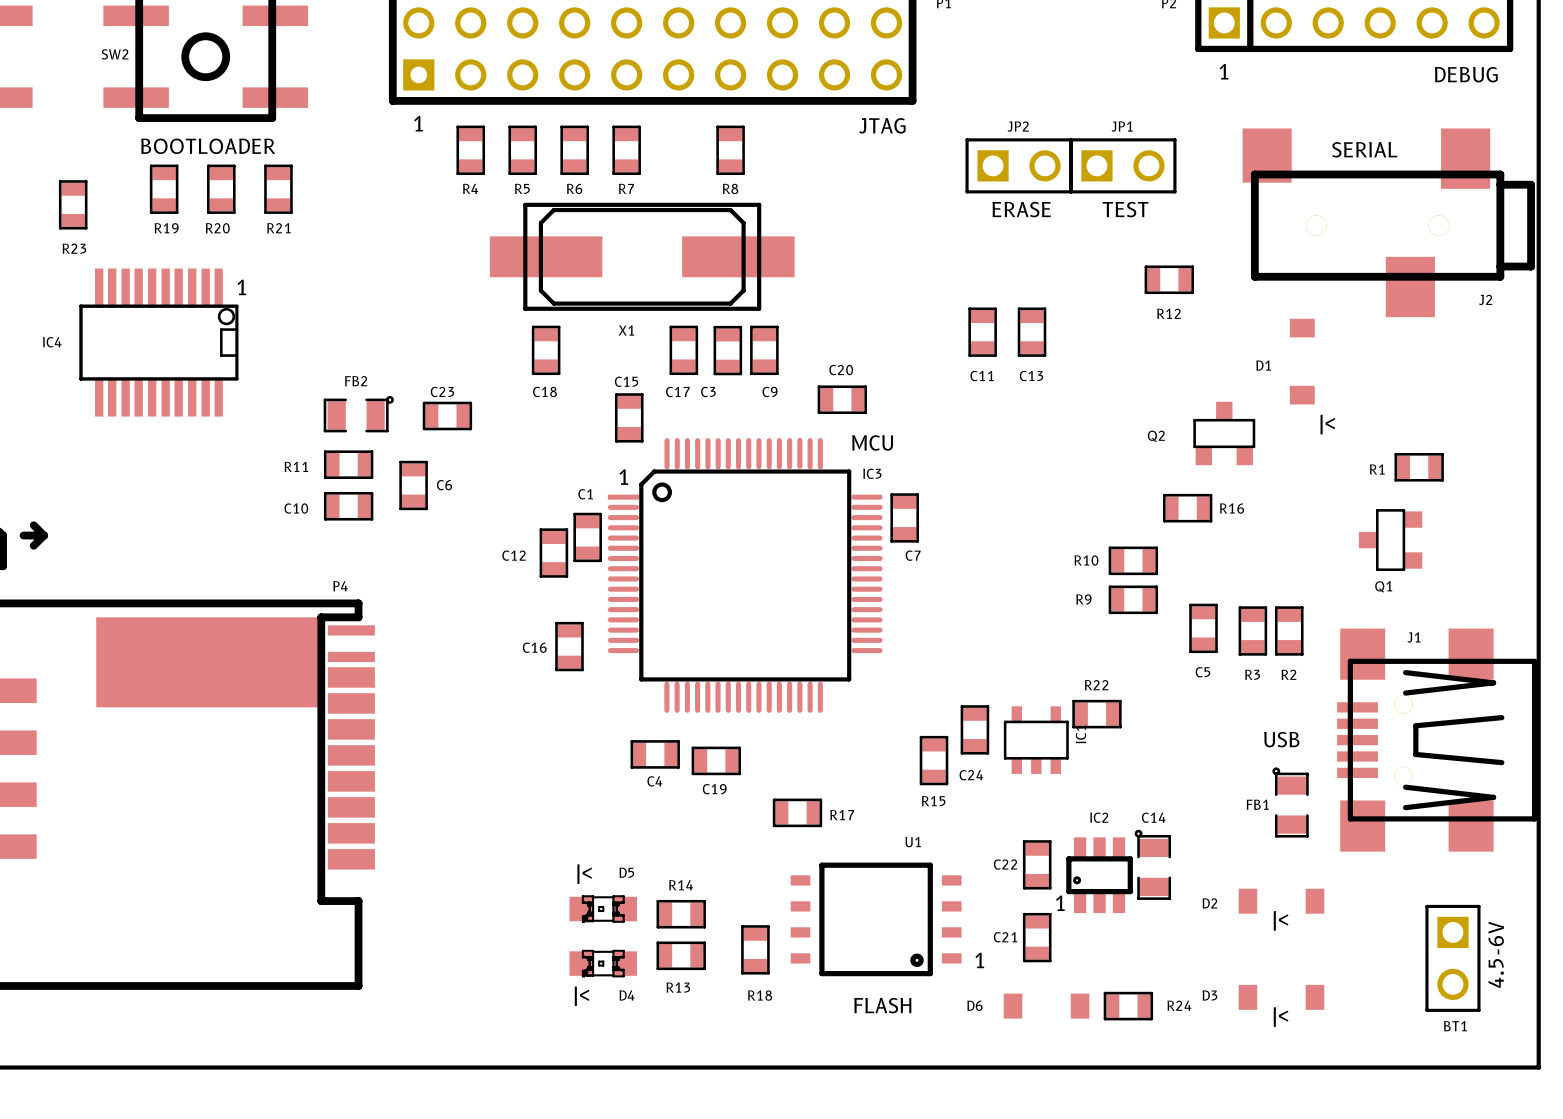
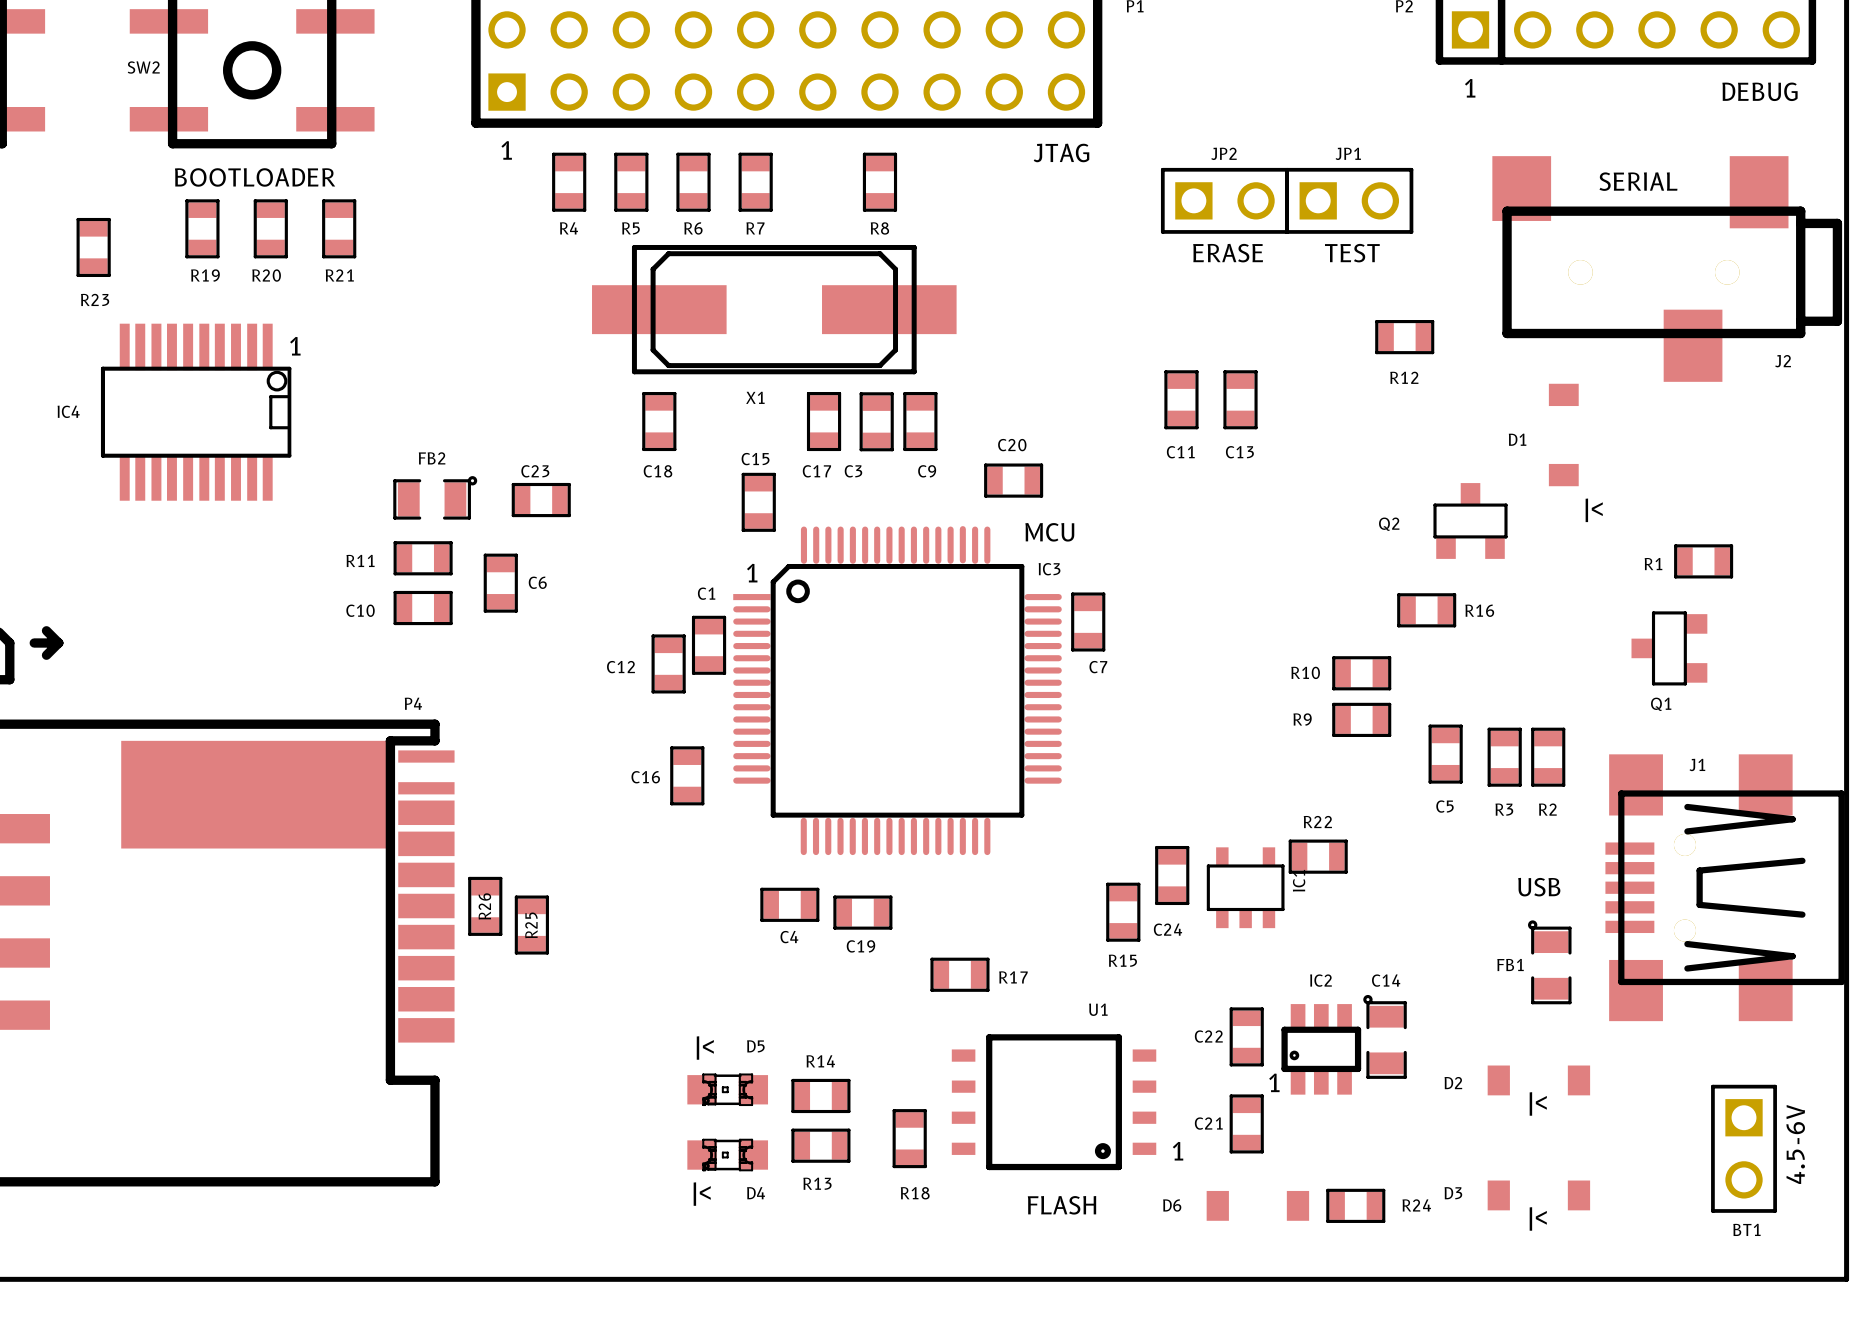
R26: none -> (485, 906)
R25: none -> (531, 925)

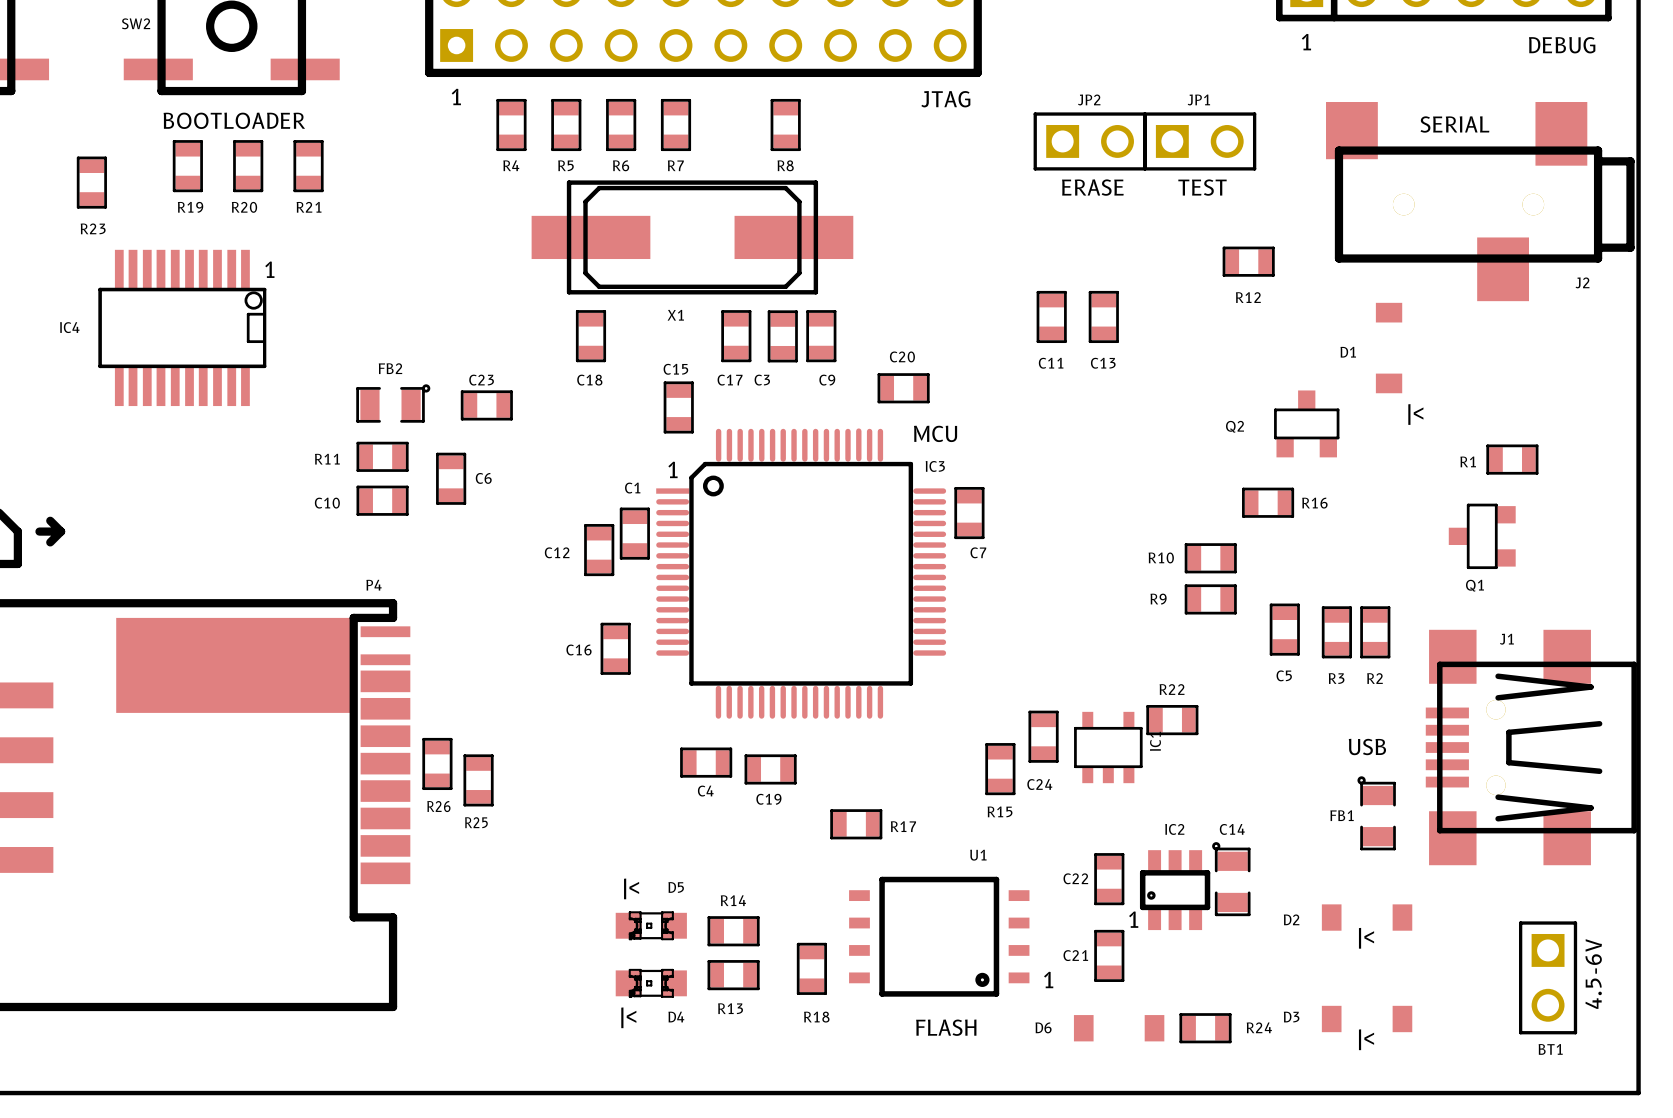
R26 name rotation: 0° (484, 906) -> 90° clockwise (438, 806)
R26 name position: R26 (484, 906) -> R26 (438, 806)
R25 name rotation: 0° (531, 925) -> 90° clockwise (476, 822)
R25 name position: R25 (531, 925) -> R25 (476, 822)

